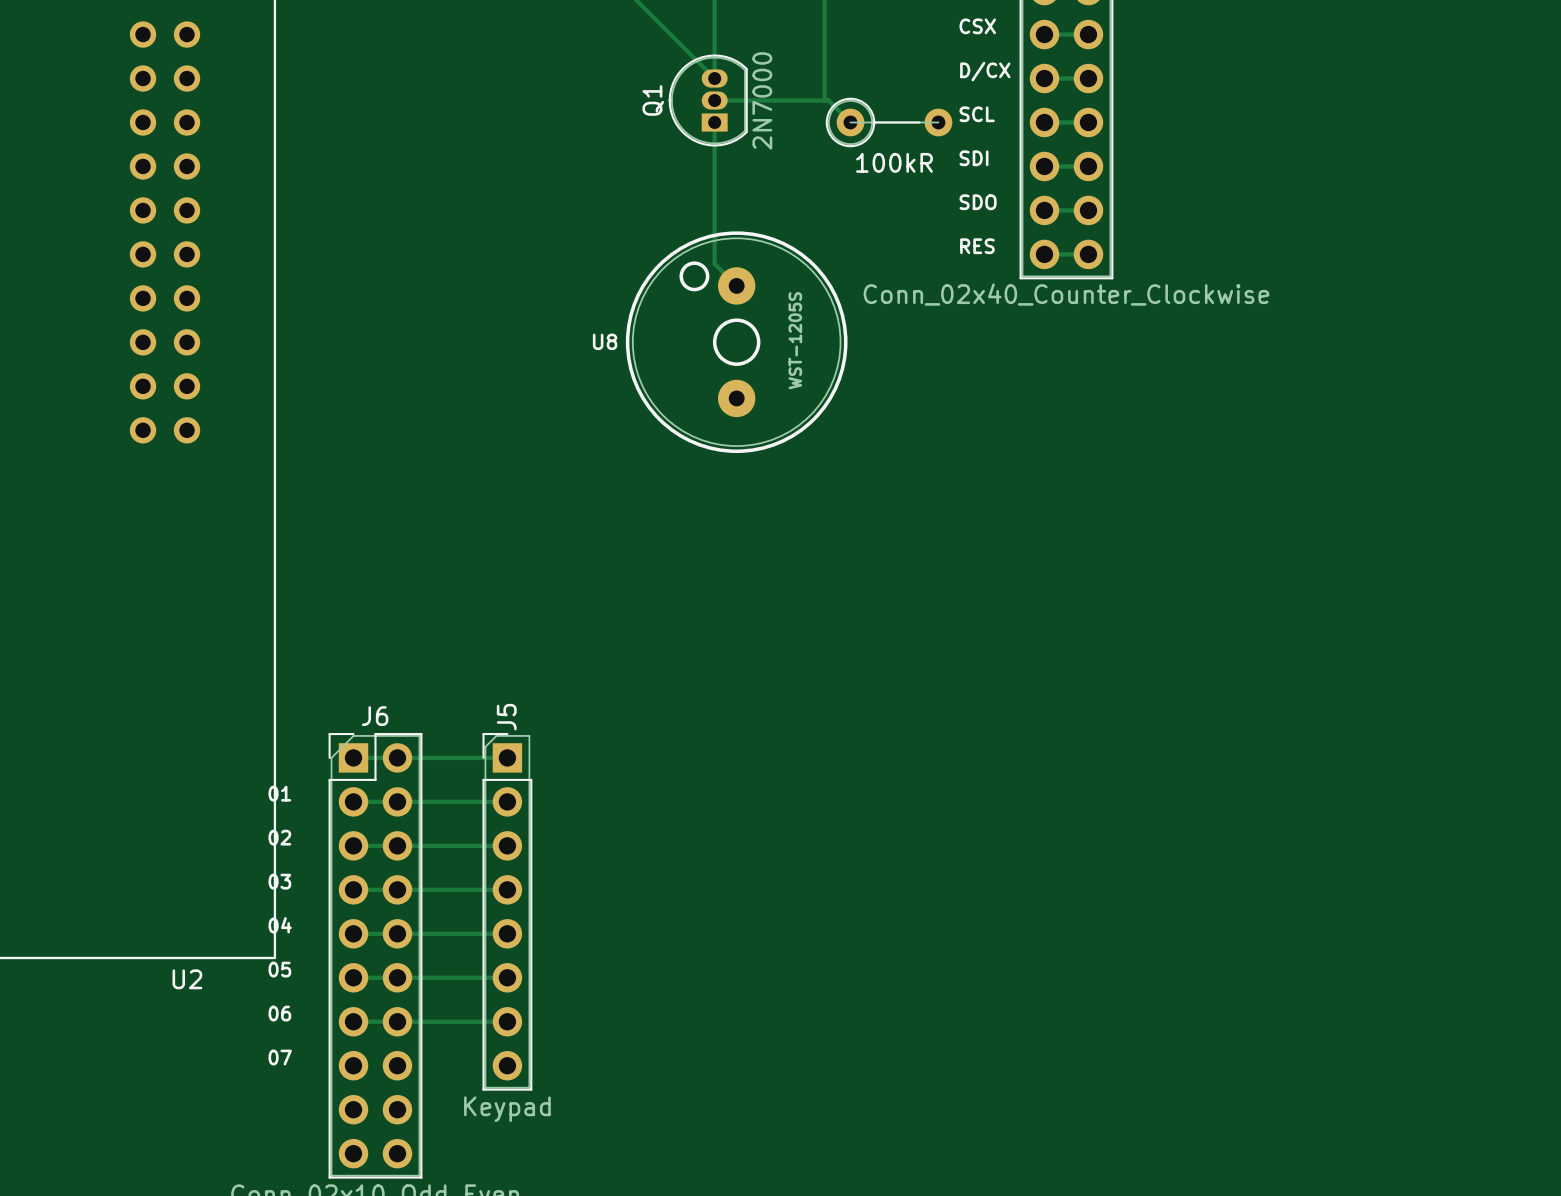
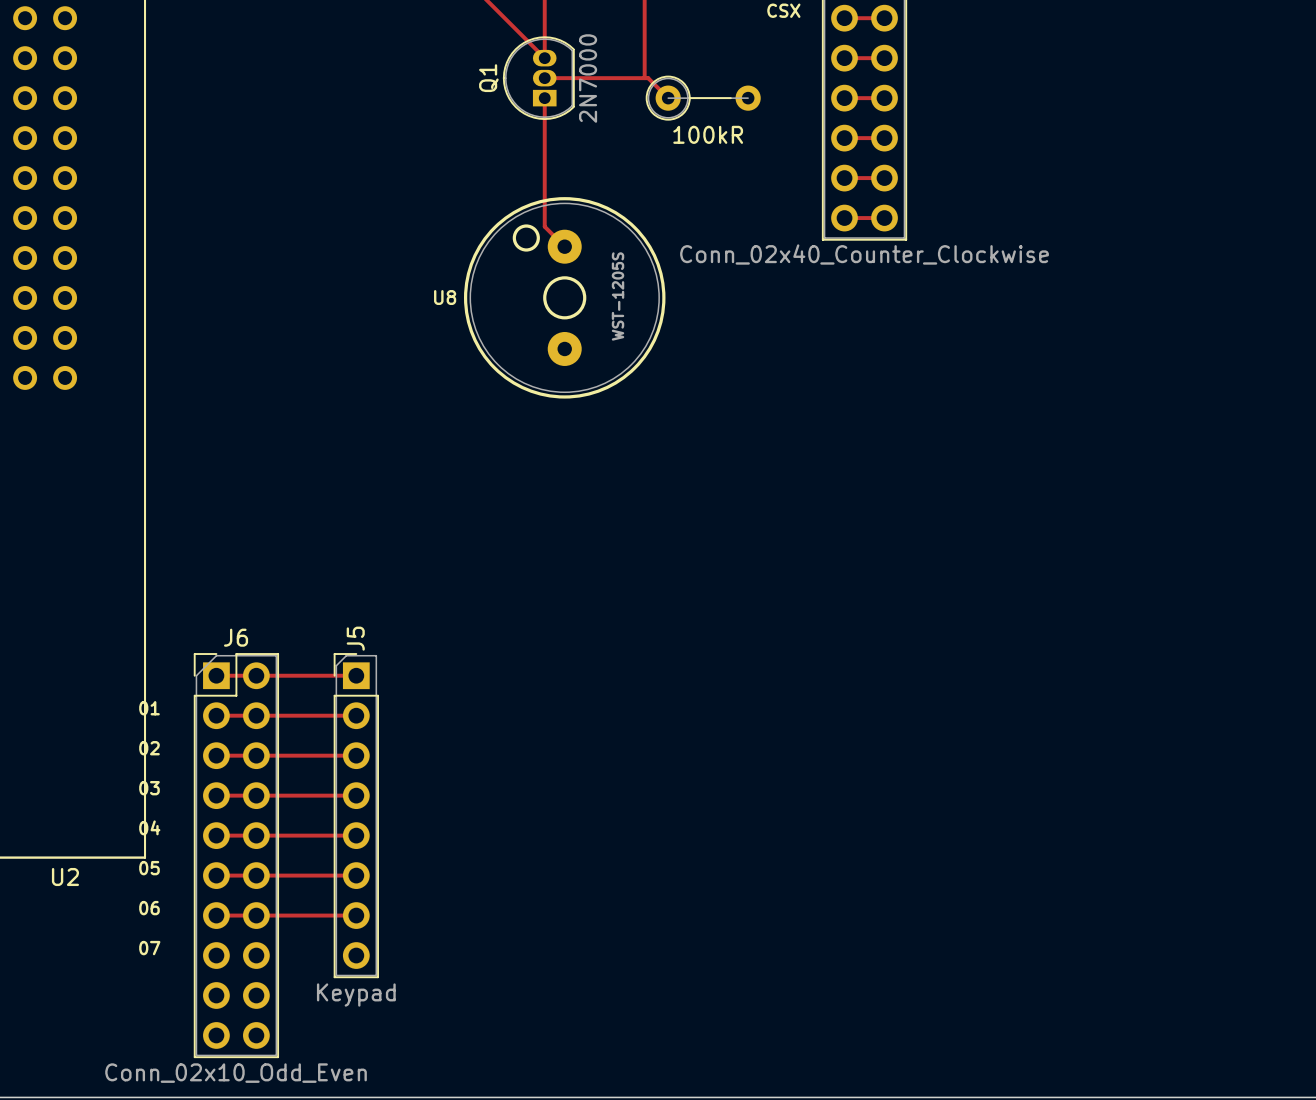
text: D/CX (985, 71) -> none
text: SCL (977, 114) -> none
text: SDI (973, 158) -> none
text: SDO (978, 202) -> none
text: RES (977, 246) -> none

